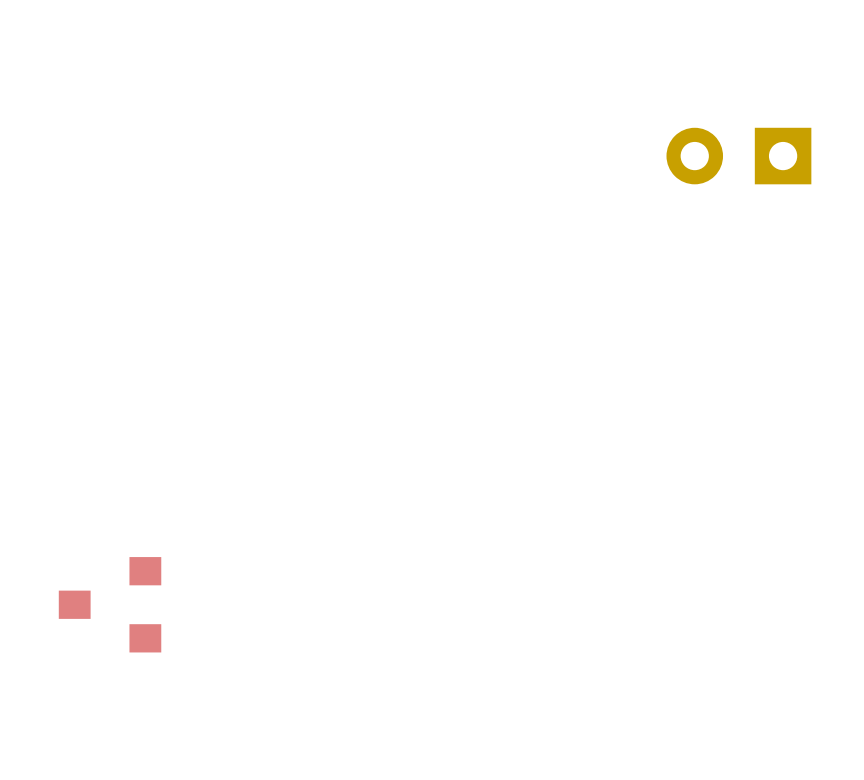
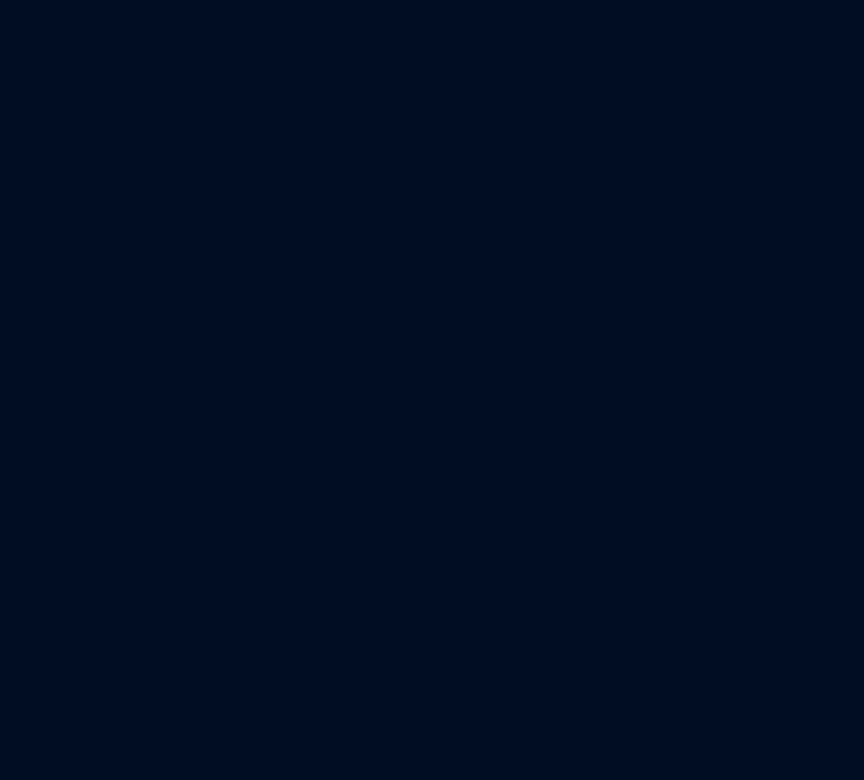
part: (738, 156) -> none
part: (110, 604) -> none

